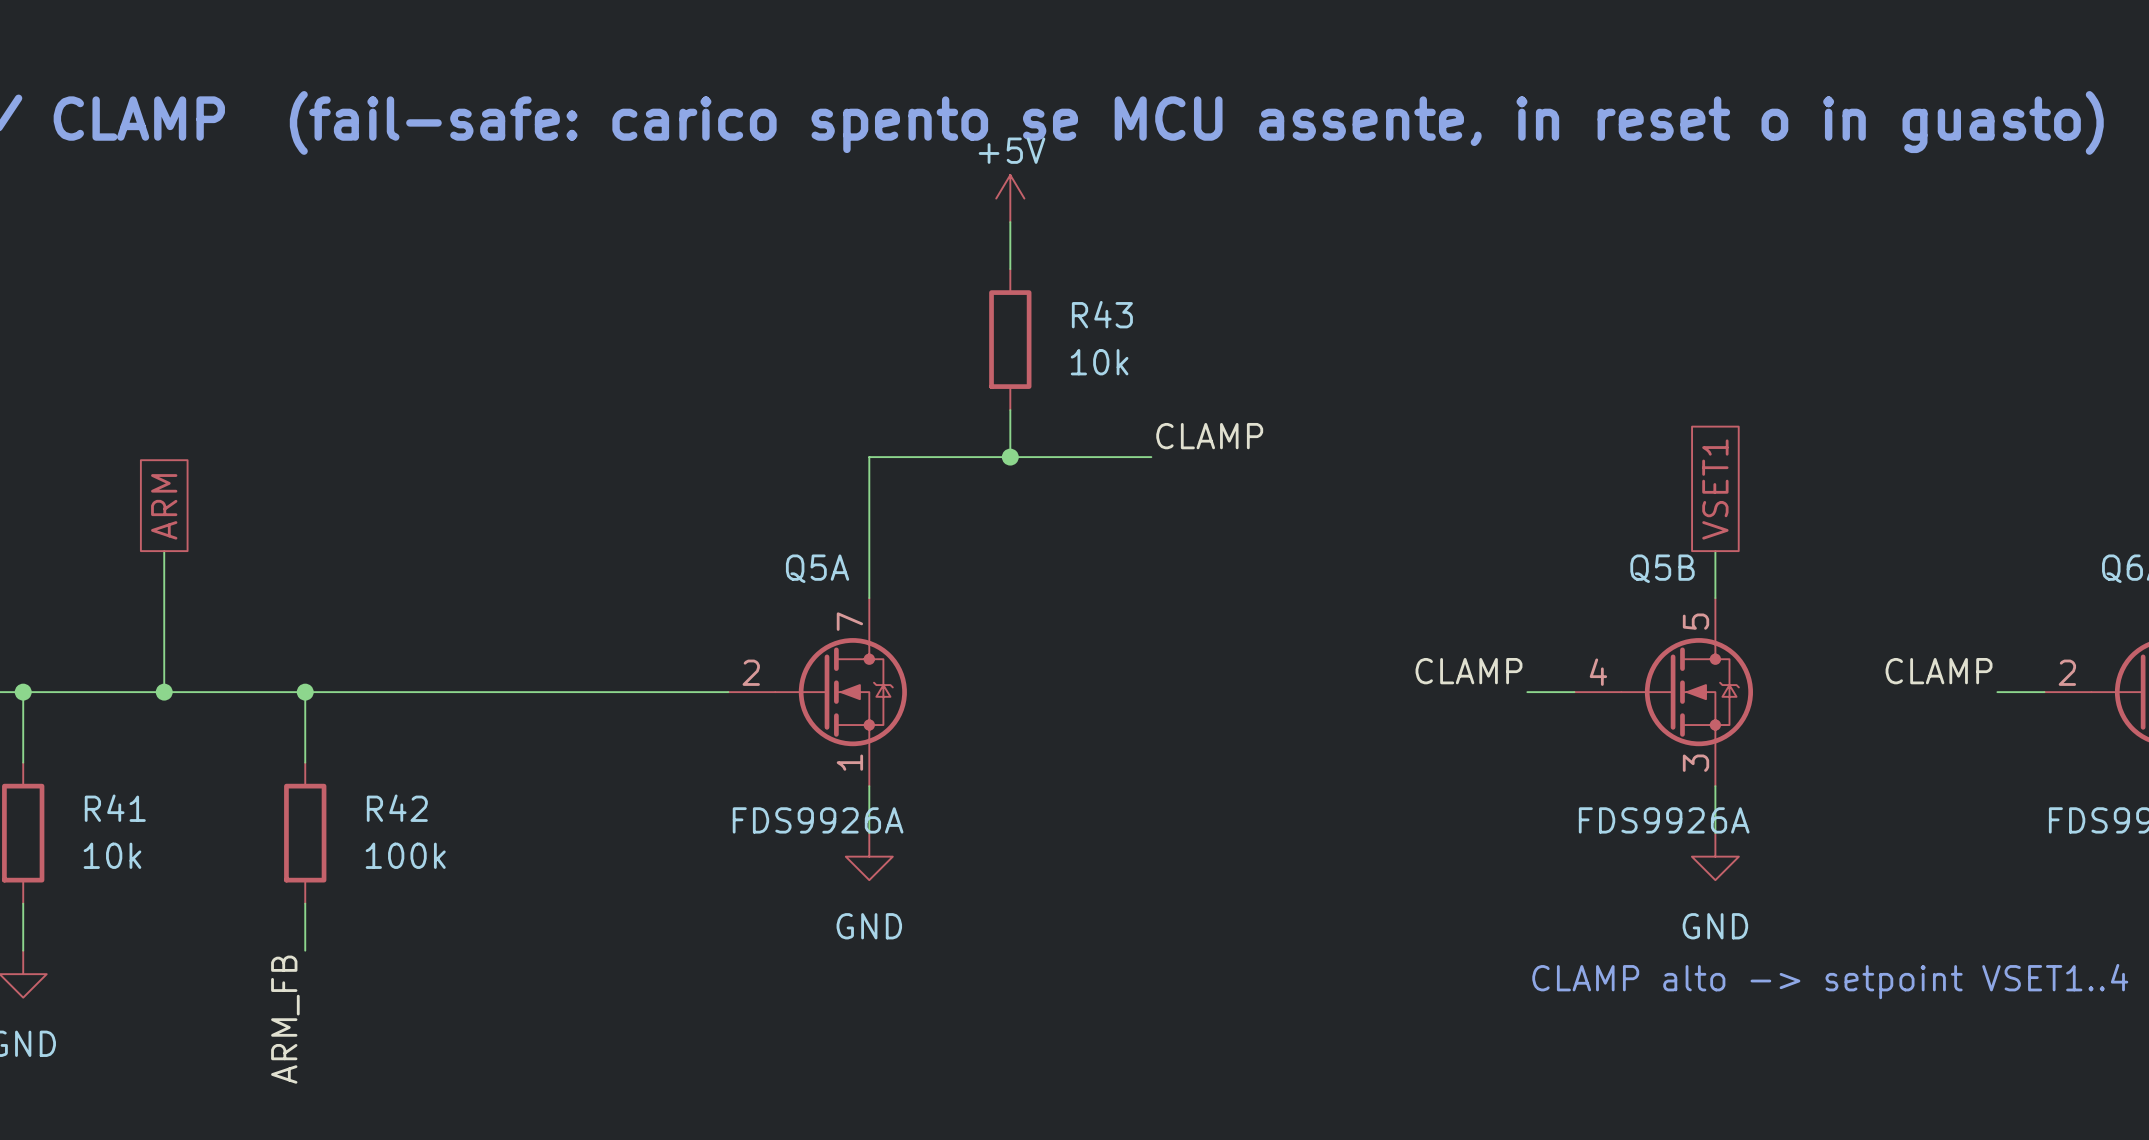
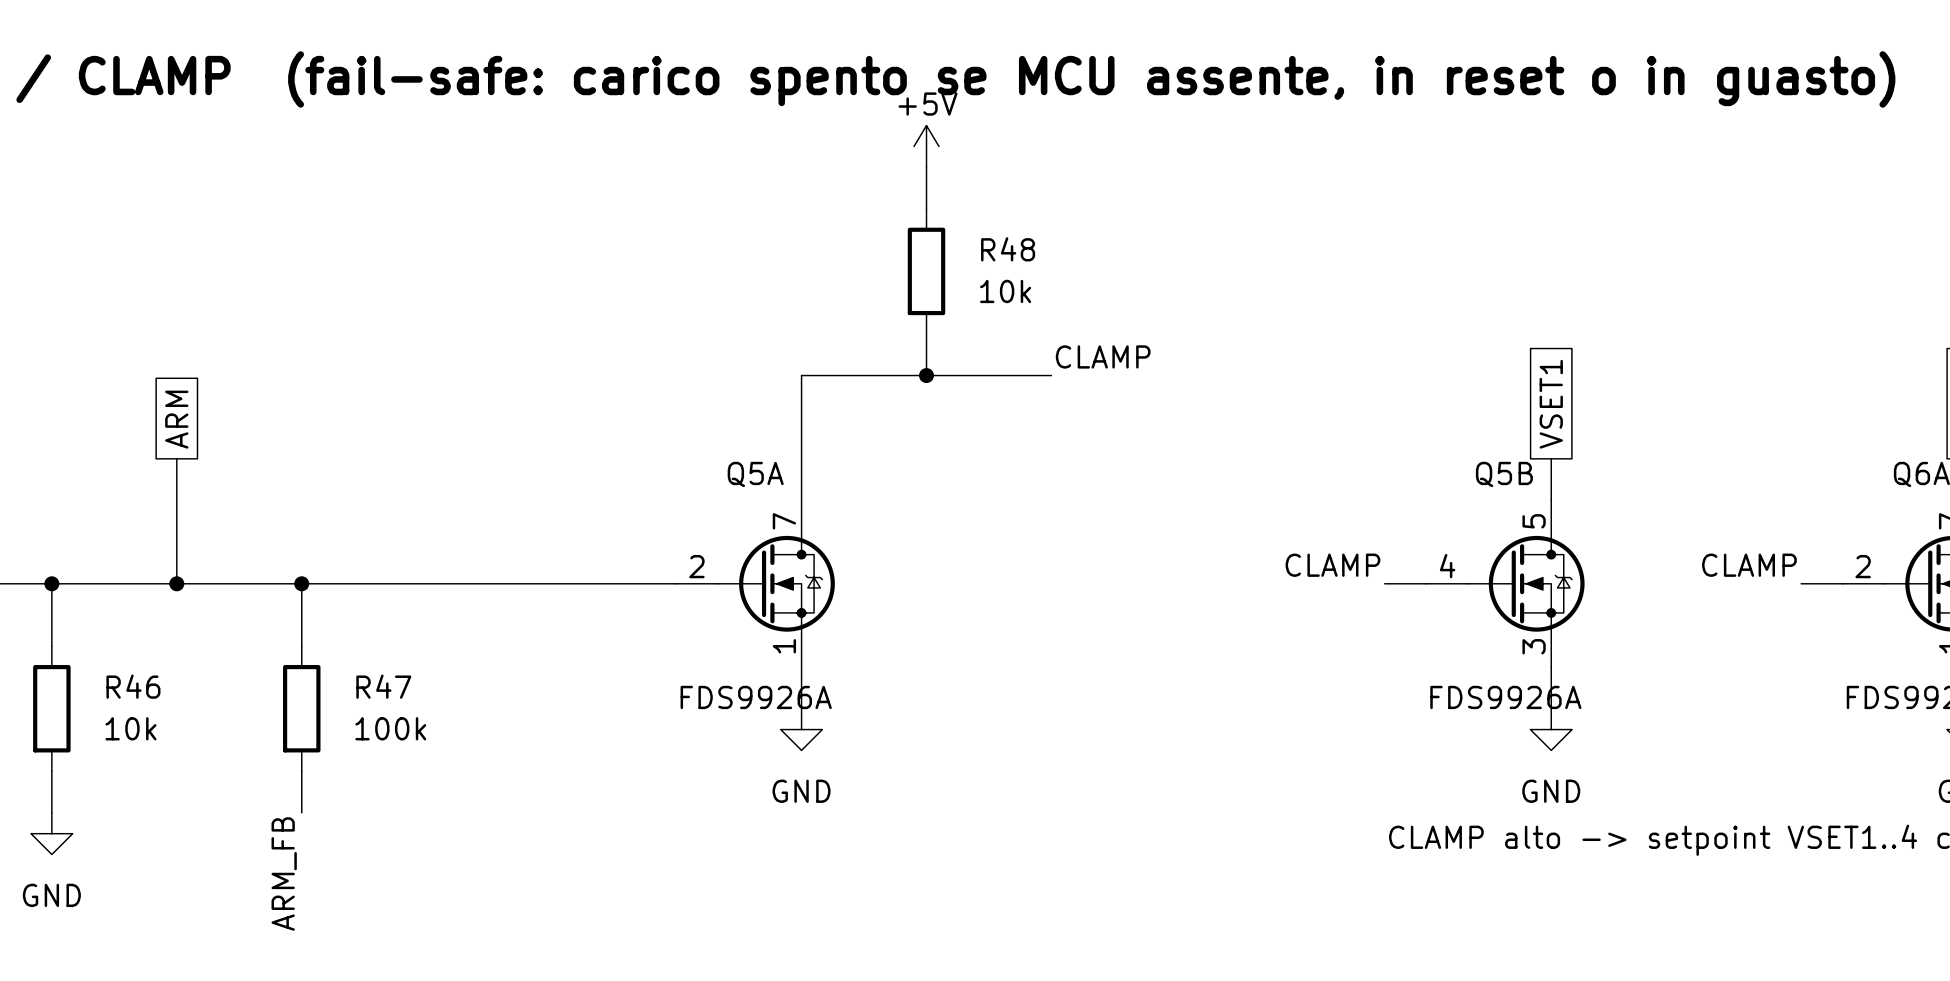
R43 name: R43 (1102, 314) -> R48 (1008, 249)
R41 name: R41 (115, 808) -> R46 (133, 686)
R42 name: R42 (397, 808) -> R47 (383, 686)

